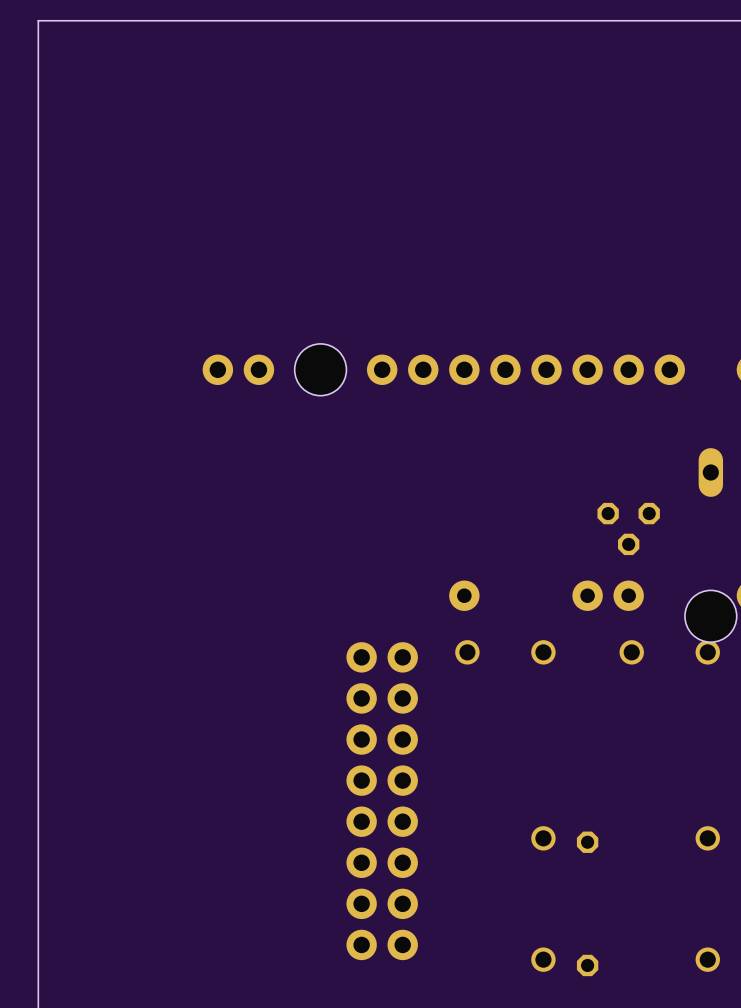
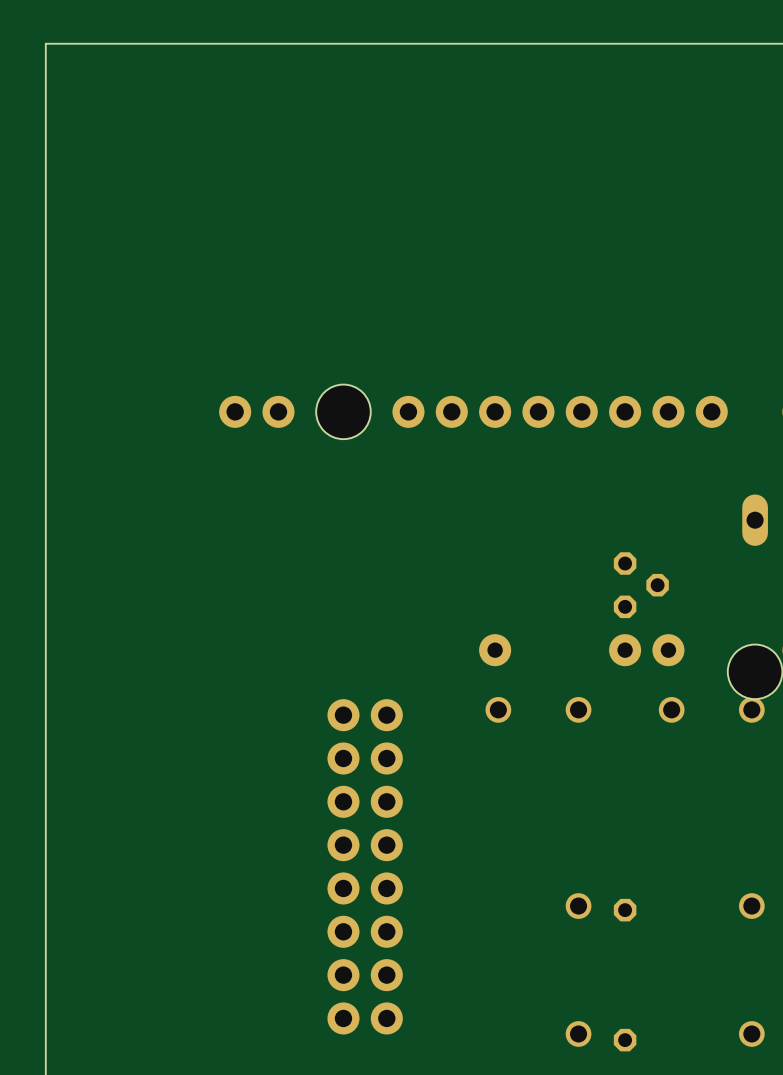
part rotation: 0° (628, 528) -> 90° counterclockwise (641, 585)
part position: (402, 801) -> (343, 866)

